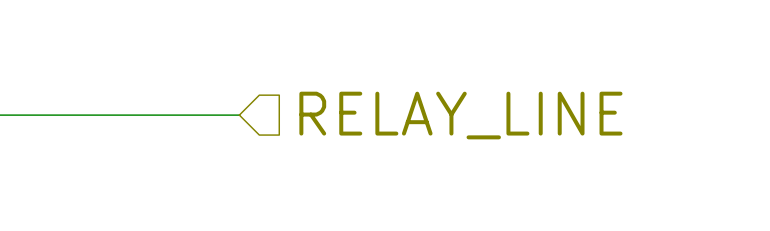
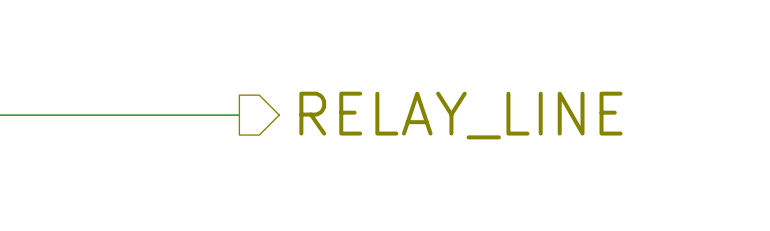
hierarchical label shape: input (460, 115) -> output (460, 115)

